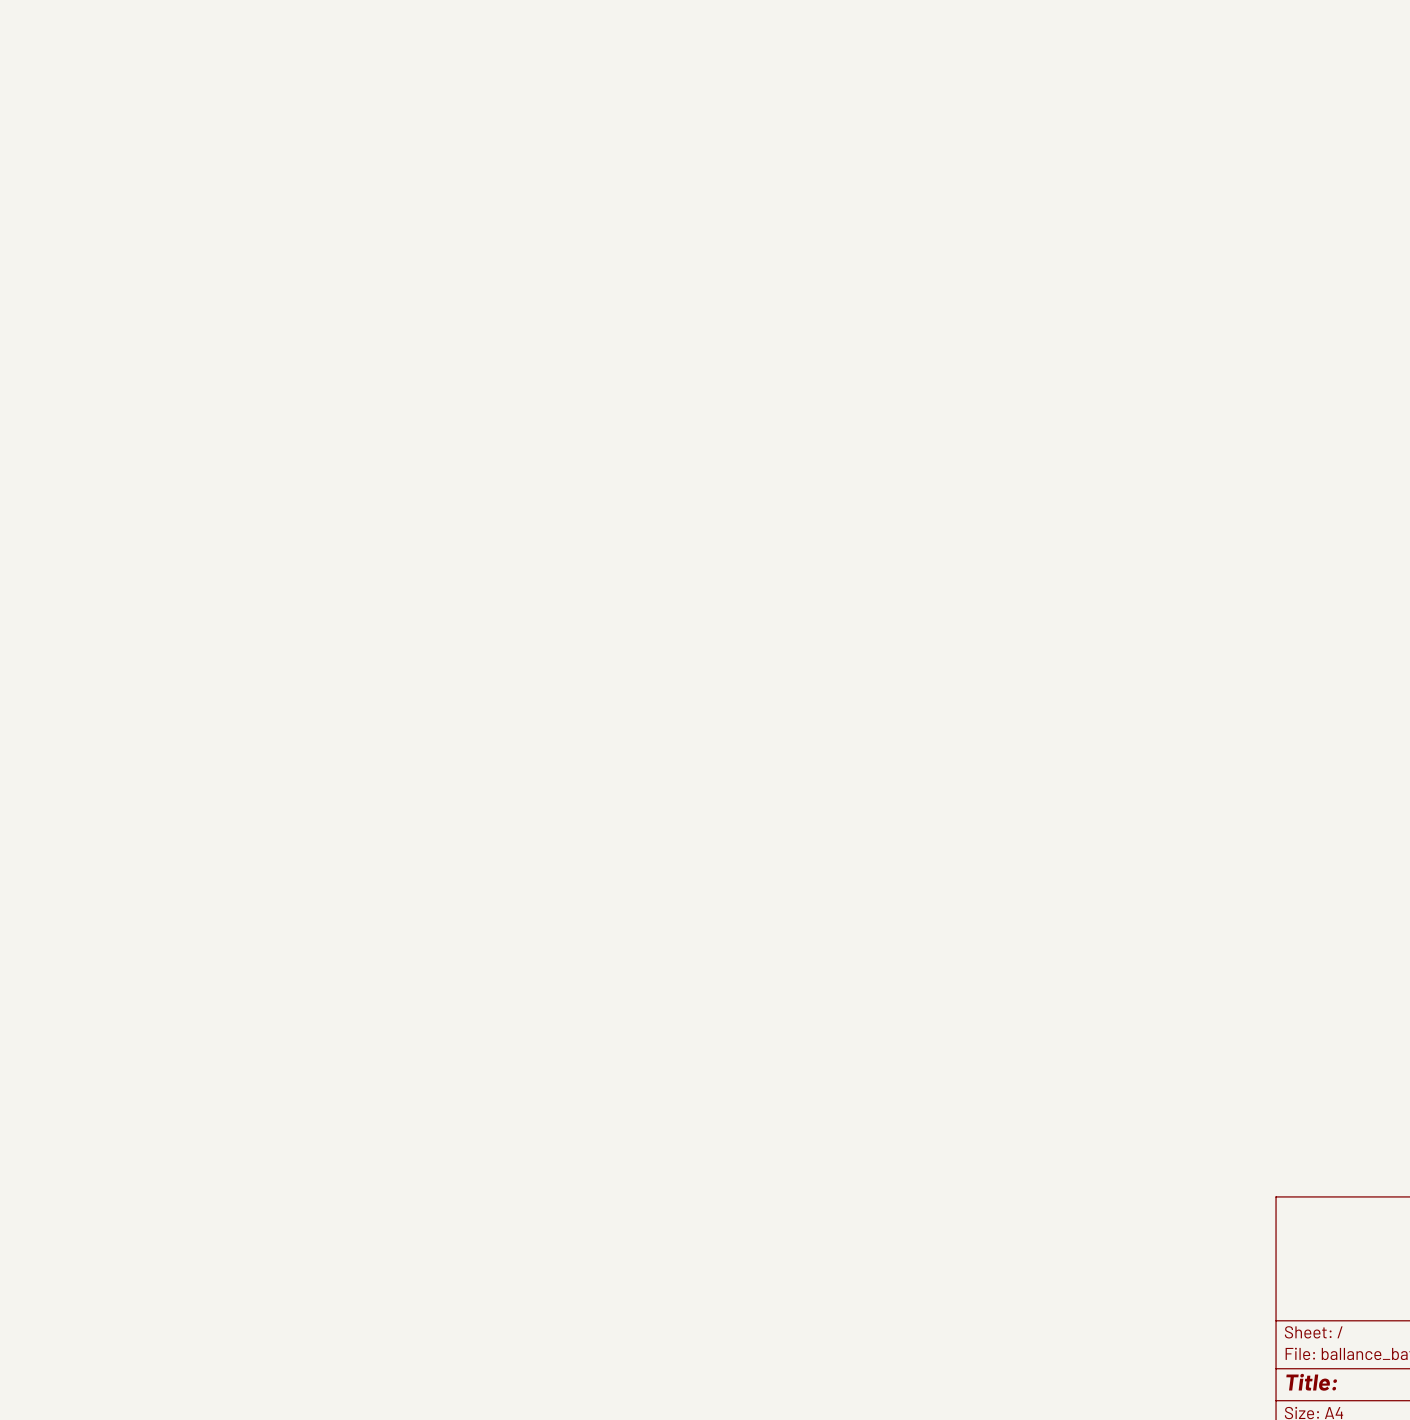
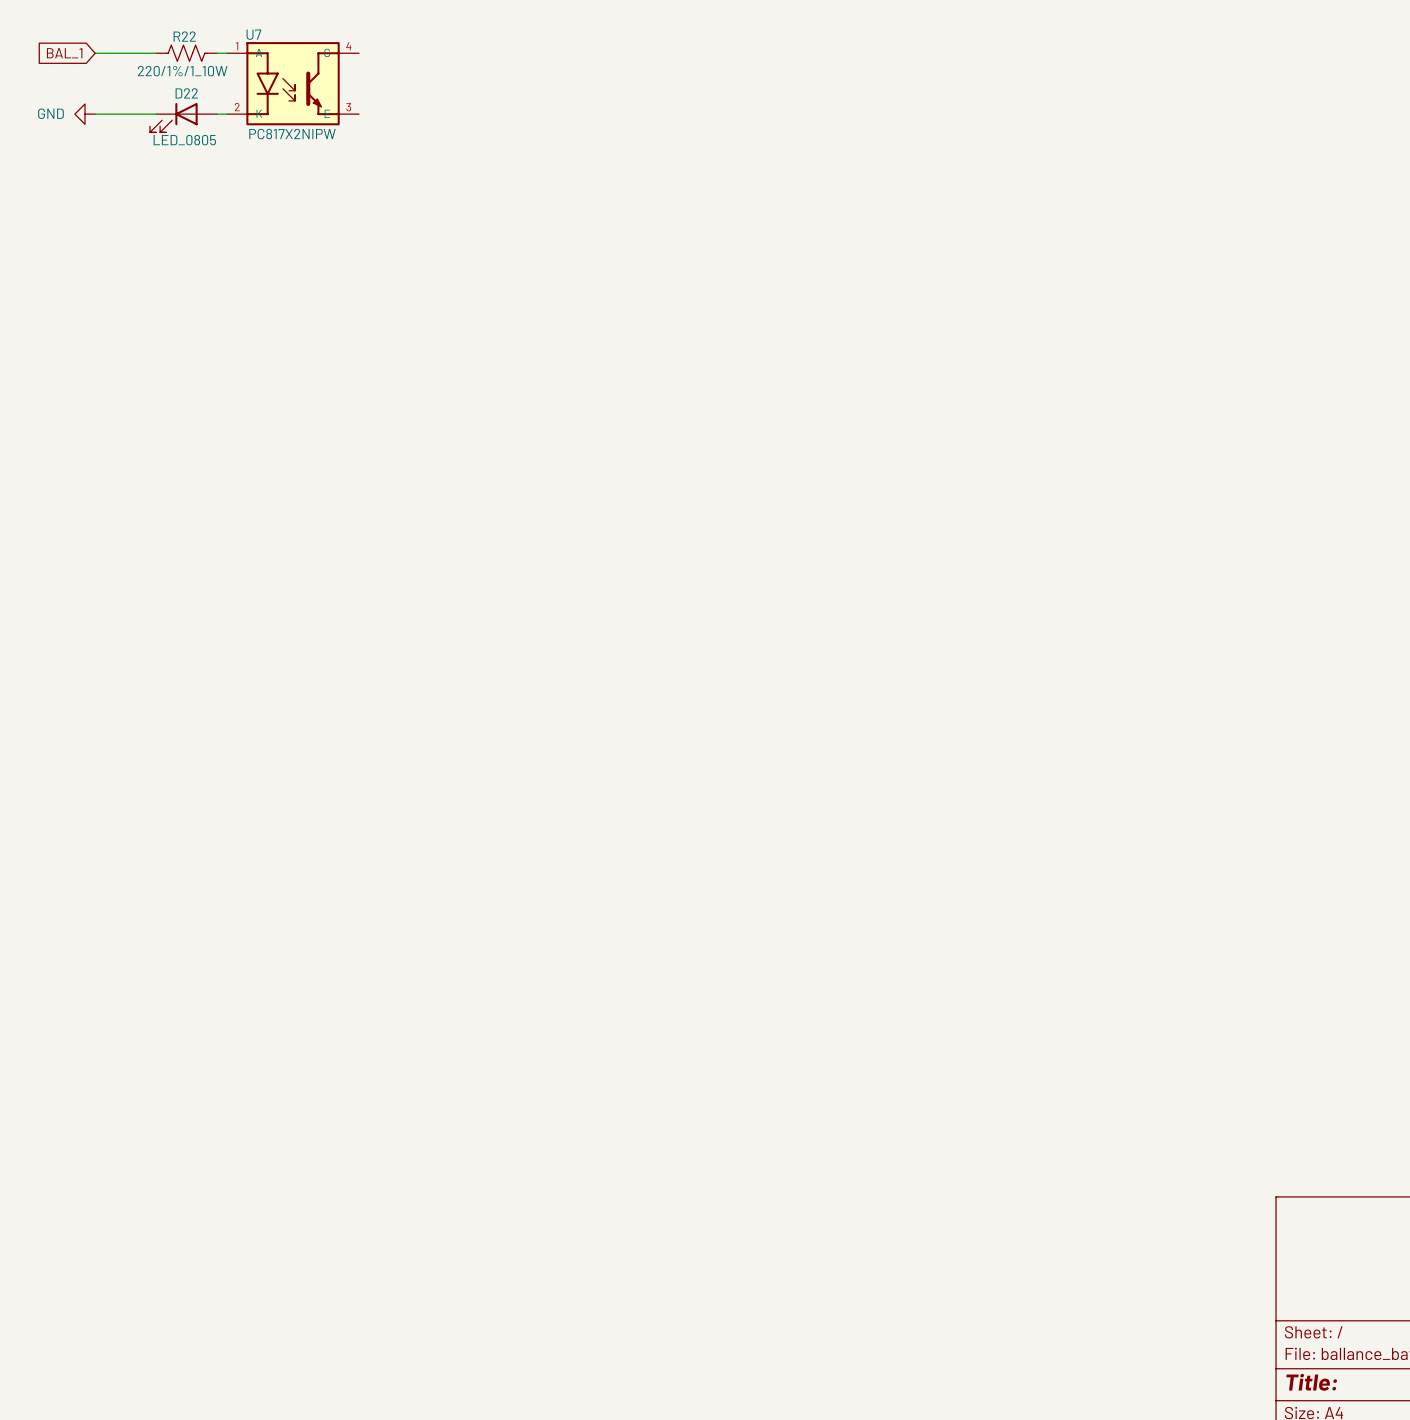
global label: none -> BAL_1 (64, 53)
wire: none -> (95, 53) (156, 53)
R22: none -> 220/1%/1_10W (186, 53)
wire: none -> (216, 53) (227, 53)
U7: none -> PC817X2NIPW (293, 83)
power symbol: none -> GND (85, 114)
wire: none -> (95, 114) (156, 114)
wire: none -> (216, 114) (227, 114)
D22: none -> LED_0805 (183, 117)

